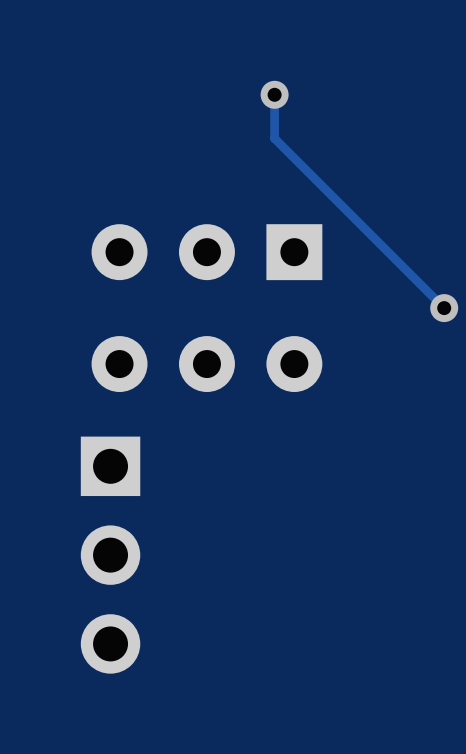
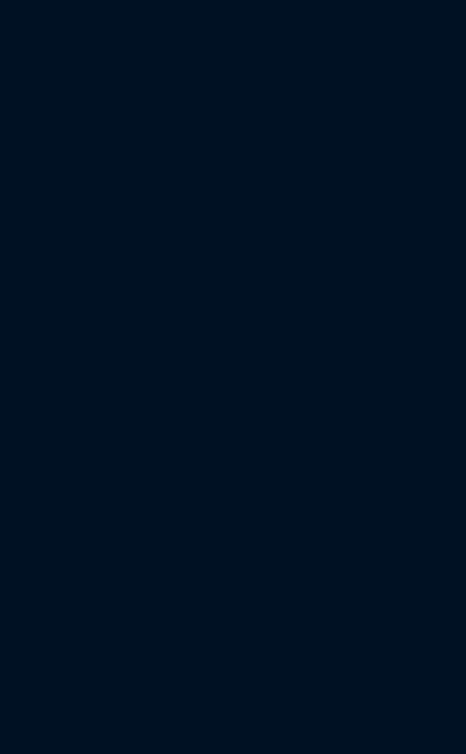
track: (274, 94) (274, 138) (444, 308) -> none
via: (274, 94) -> none
part: (206, 308) -> none
via: (444, 308) -> none
part: (110, 555) -> none

